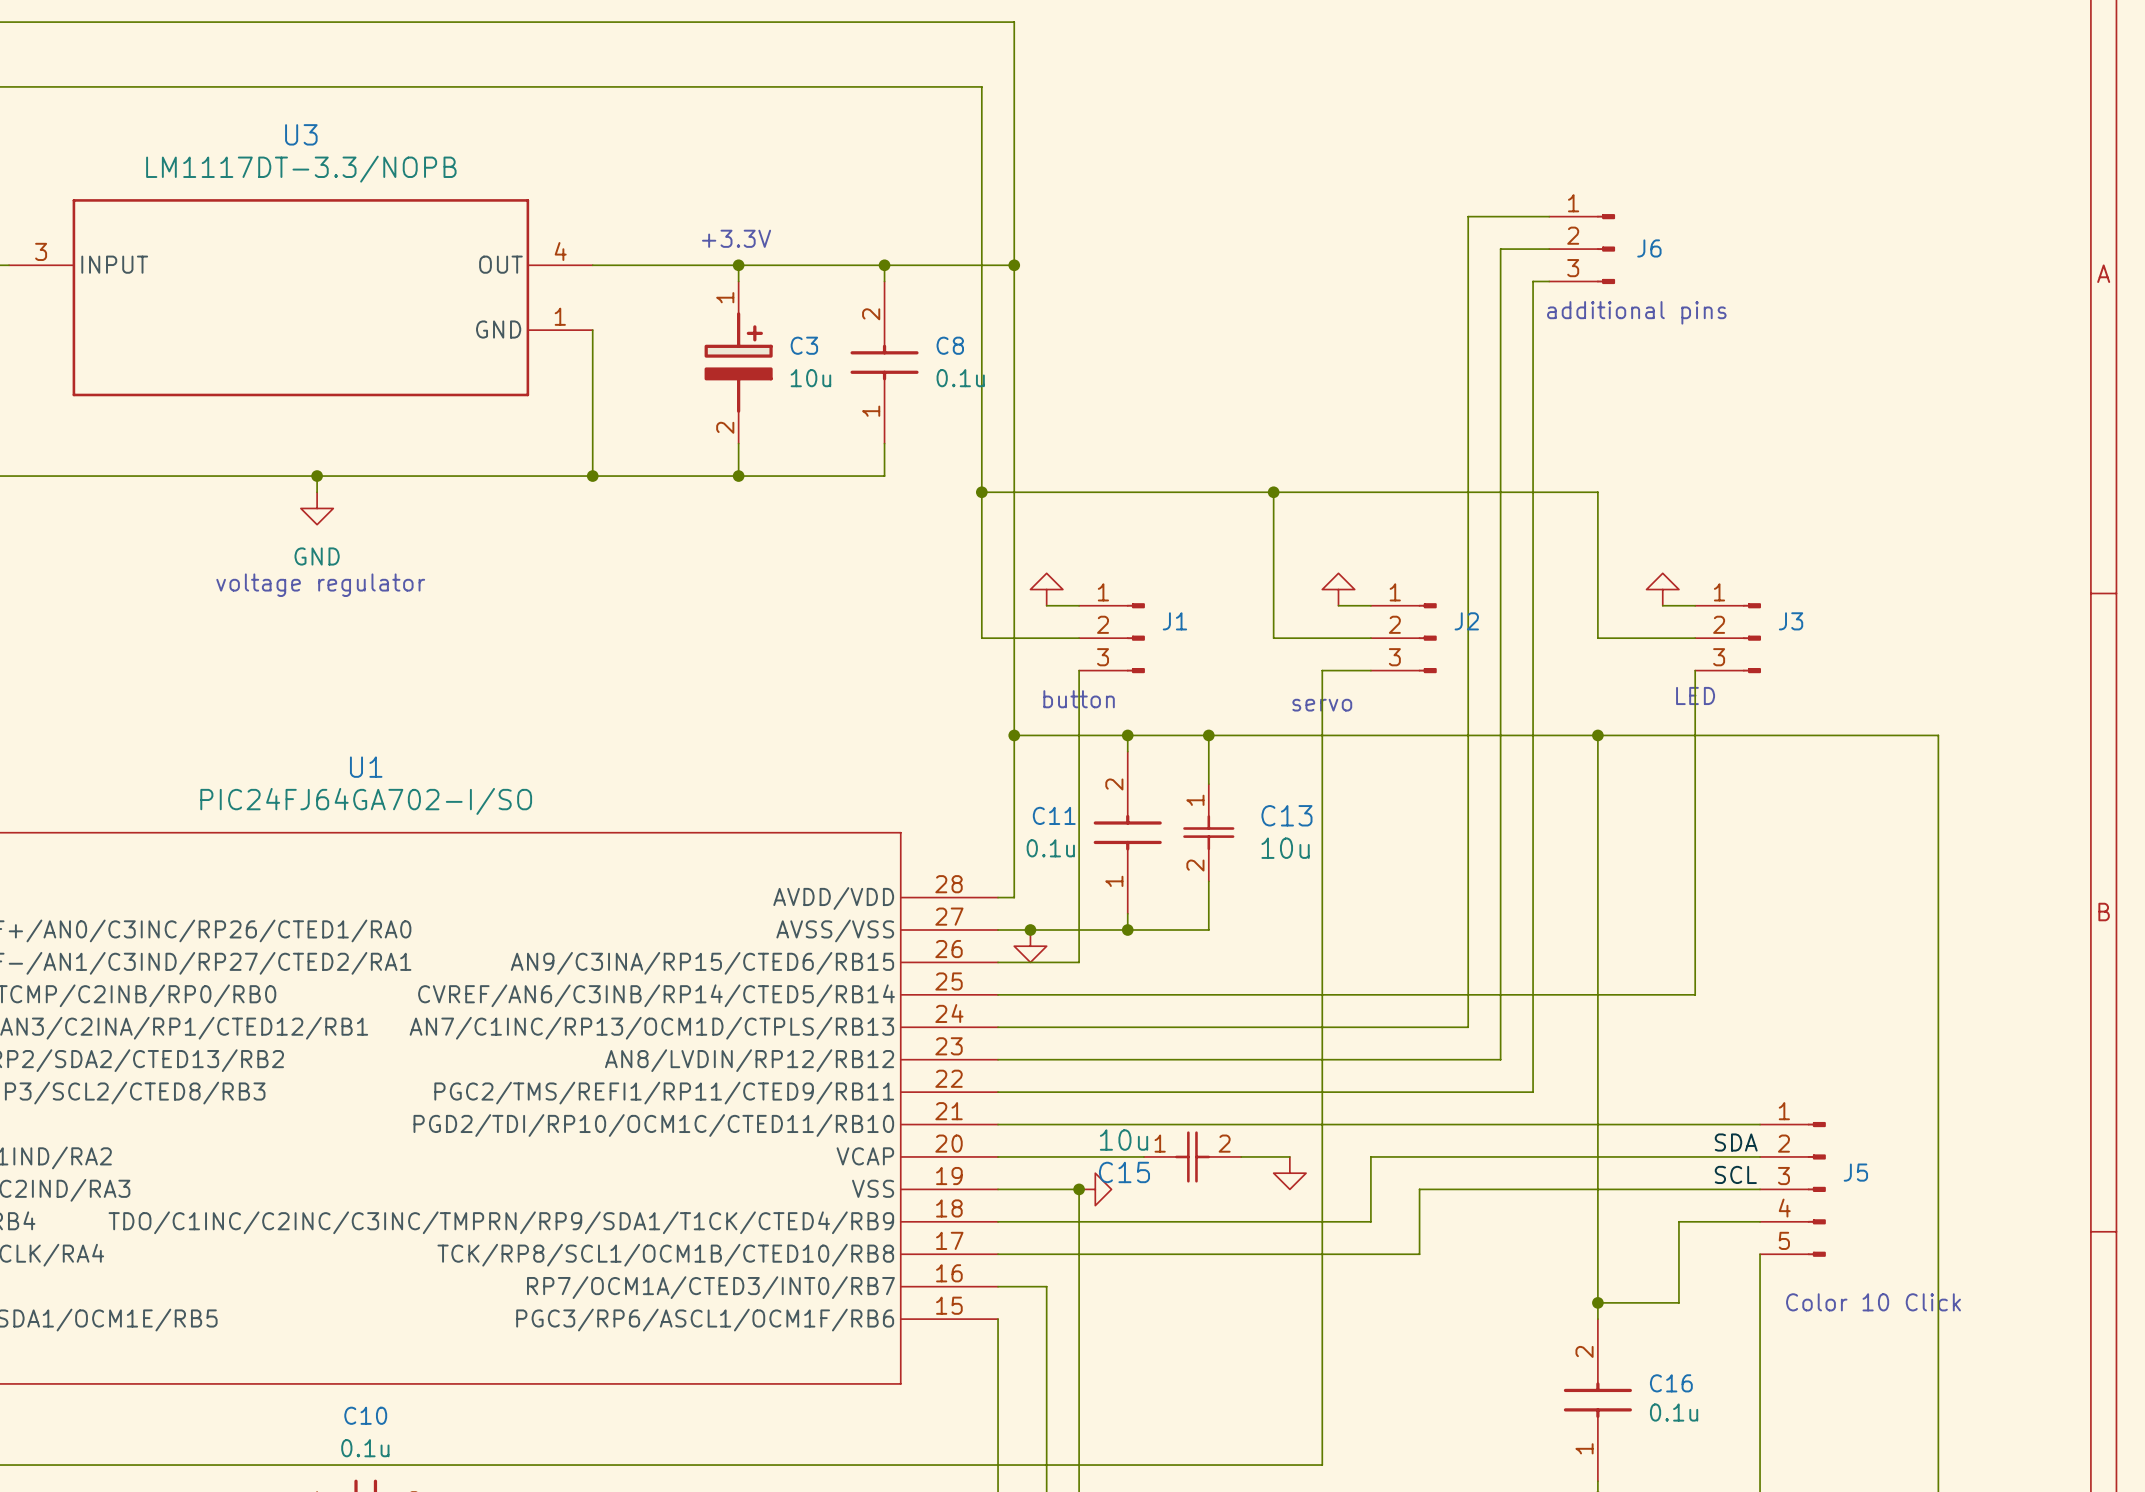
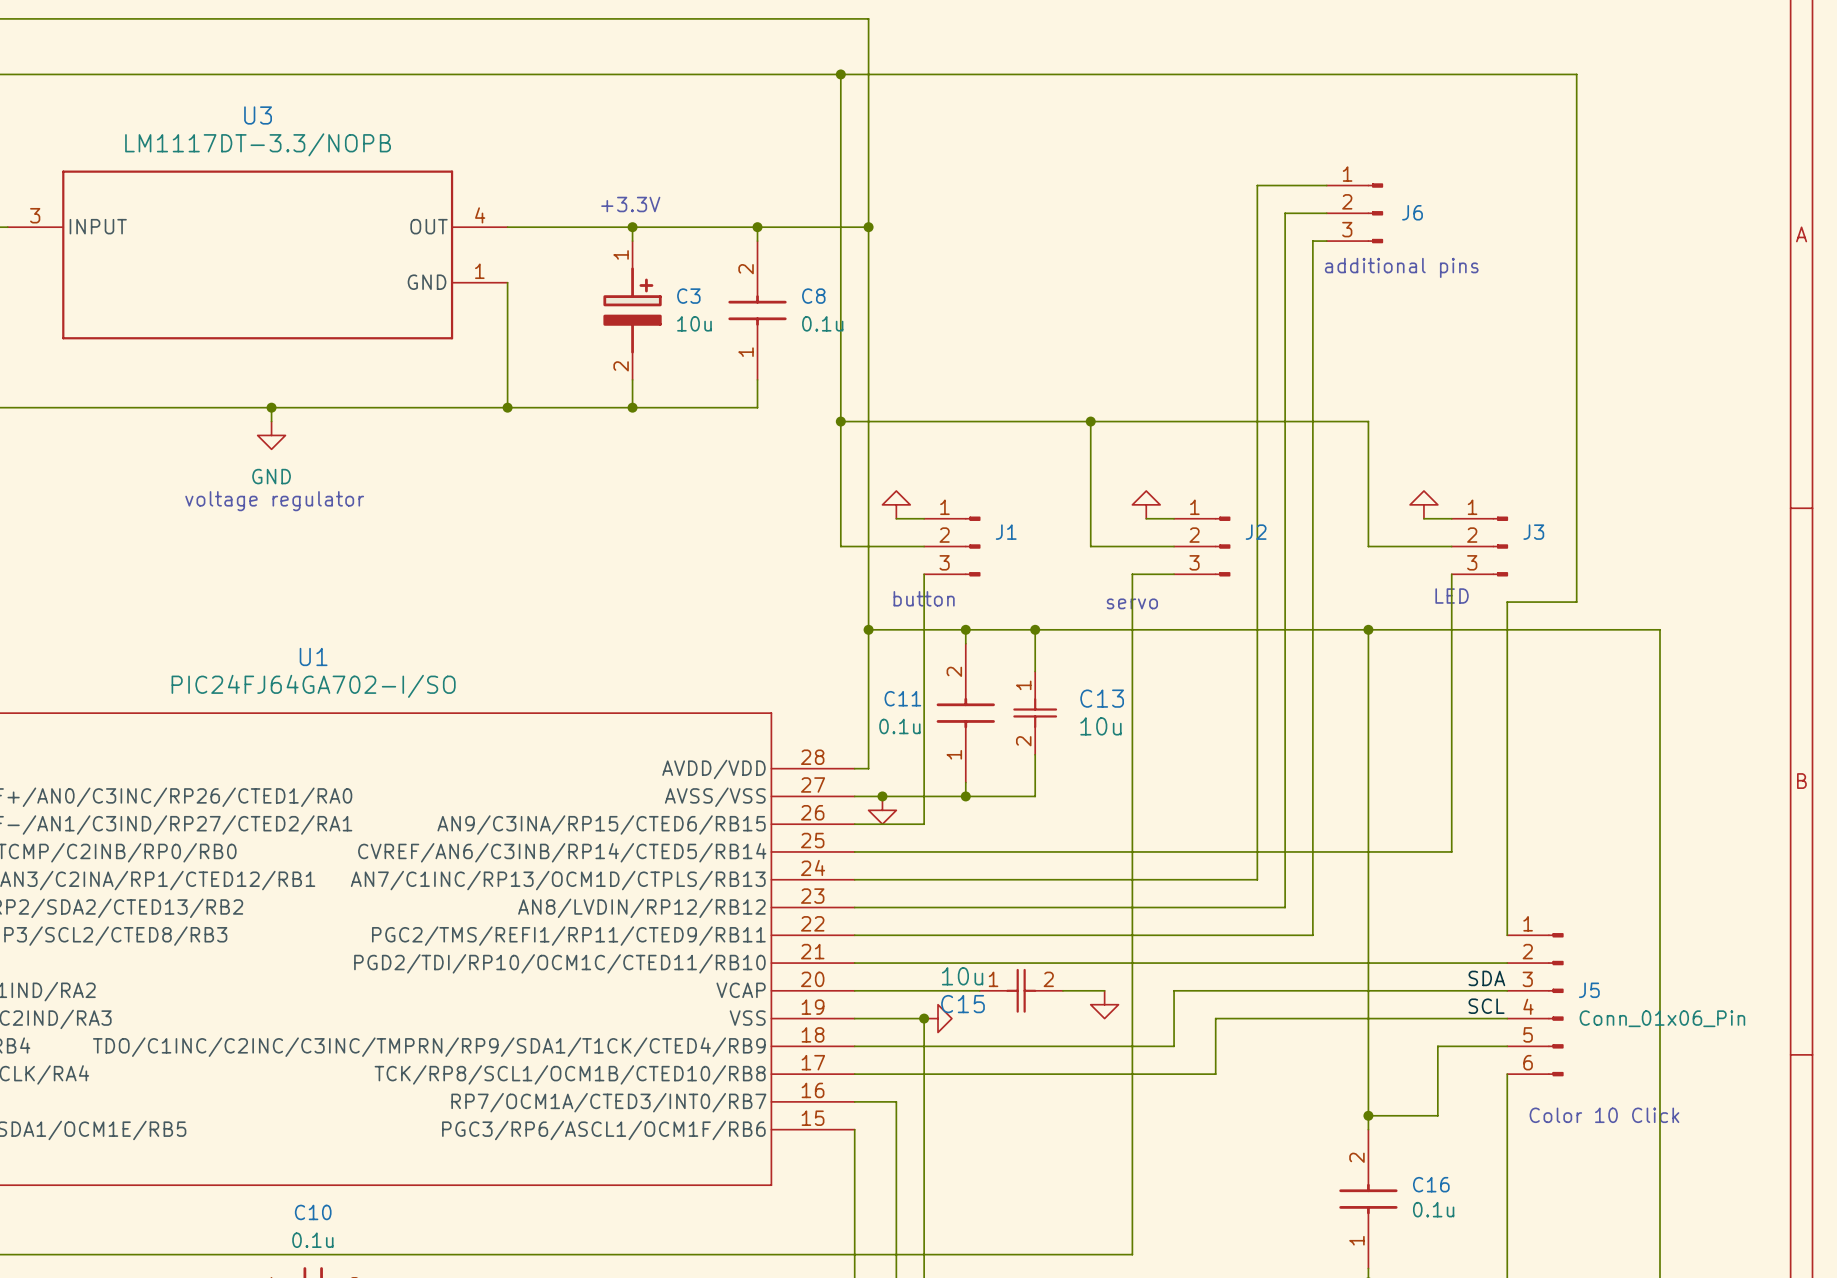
wire: none -> (840, 74) (1576, 74) (1576, 602) (1507, 602) (1507, 935)
junction: none -> (840, 74)
J5 symbol: [1760, 1121, 1826, 1257] -> [1507, 933, 1564, 1077]
J5 value: none -> Conn_01x06_Pin (1662, 1018)

